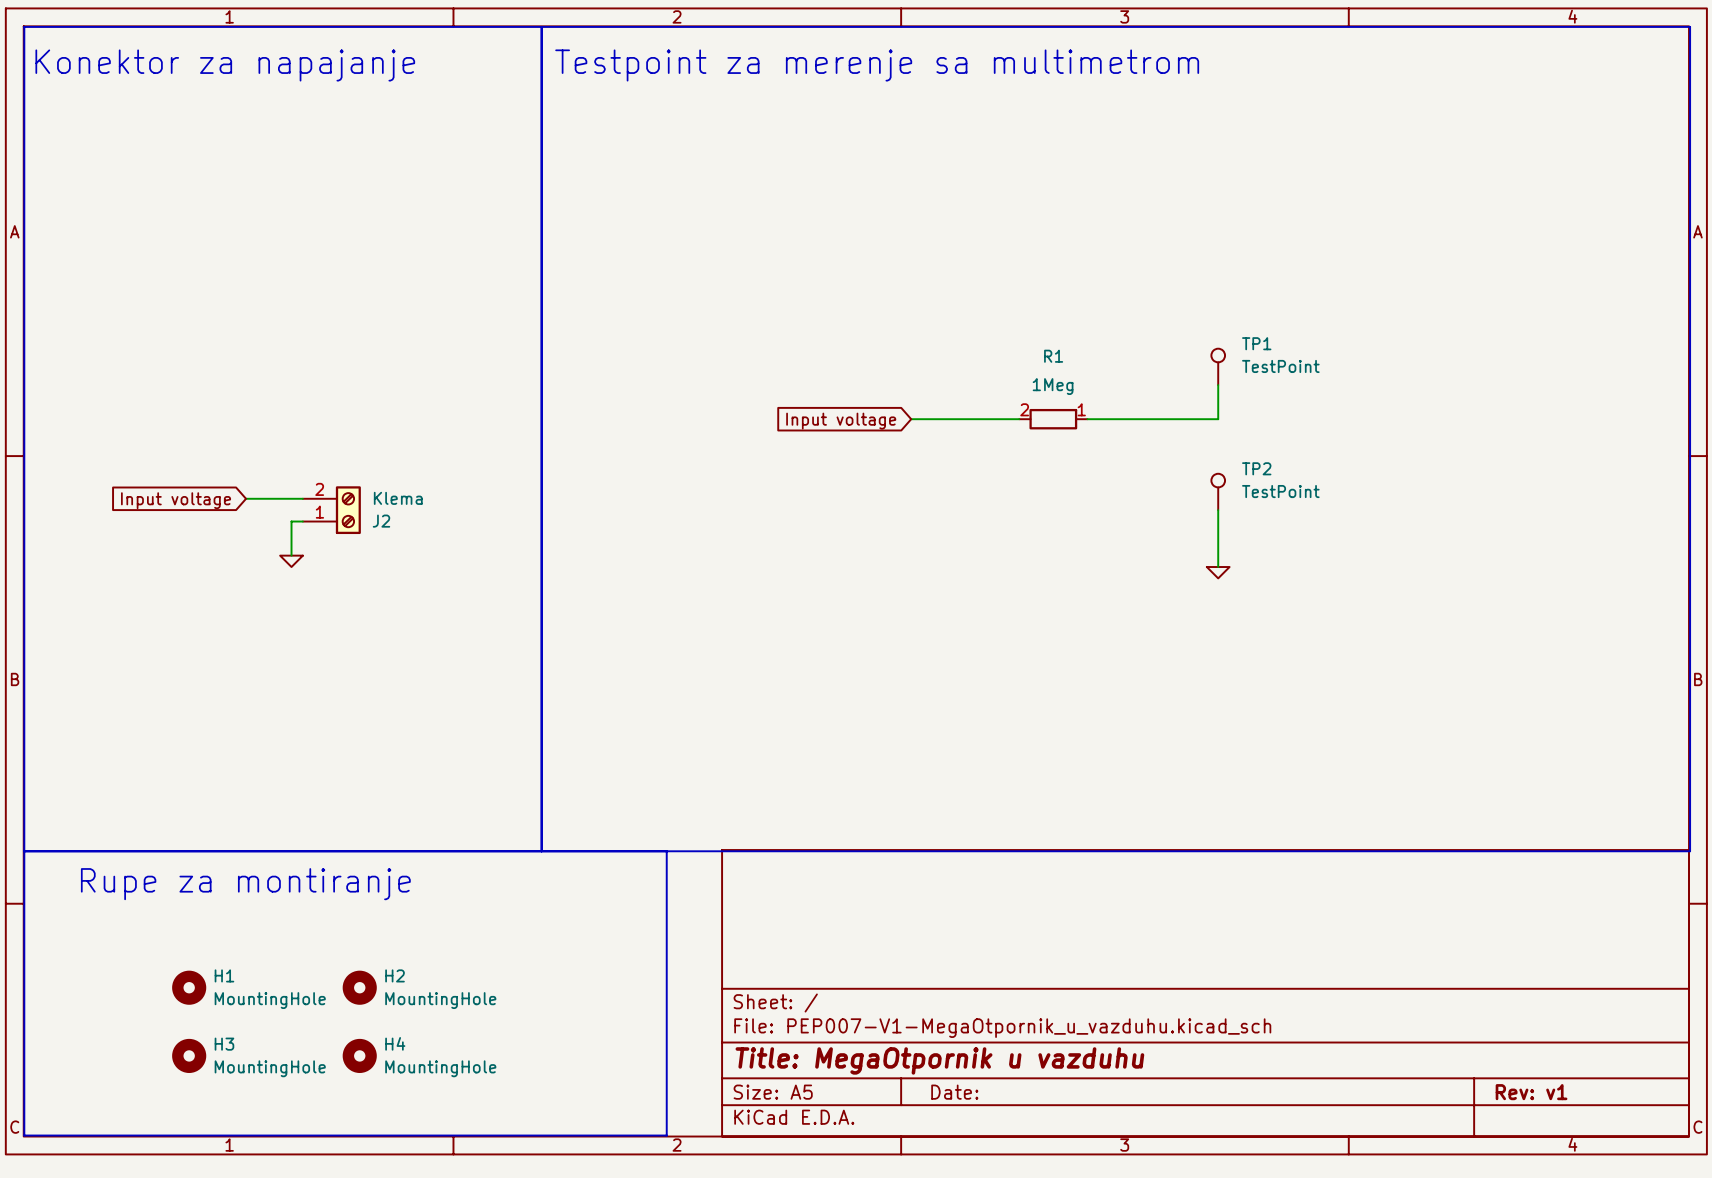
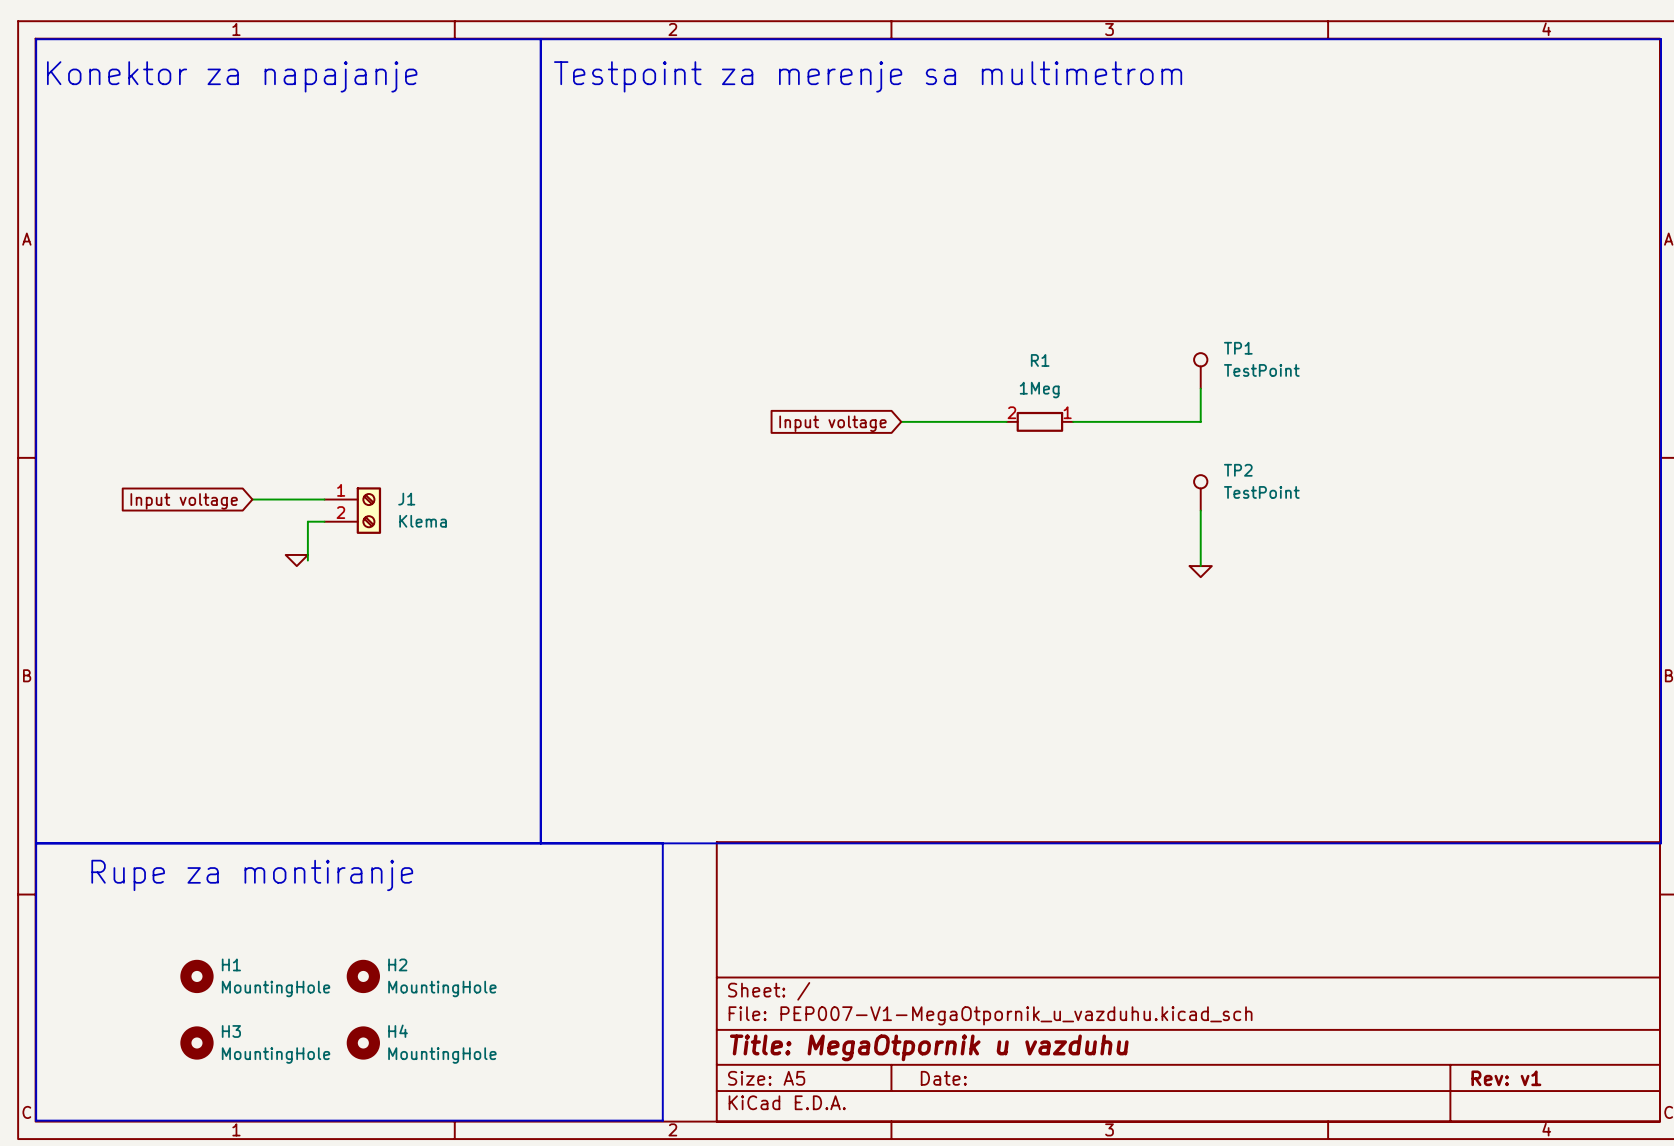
J2: Klema (331, 510) -> none
J1: none -> Klema (352, 510)
wire: (302, 521) (291, 521) (291, 555) -> none
wire: none -> (324, 521) (307, 521) (307, 560)

